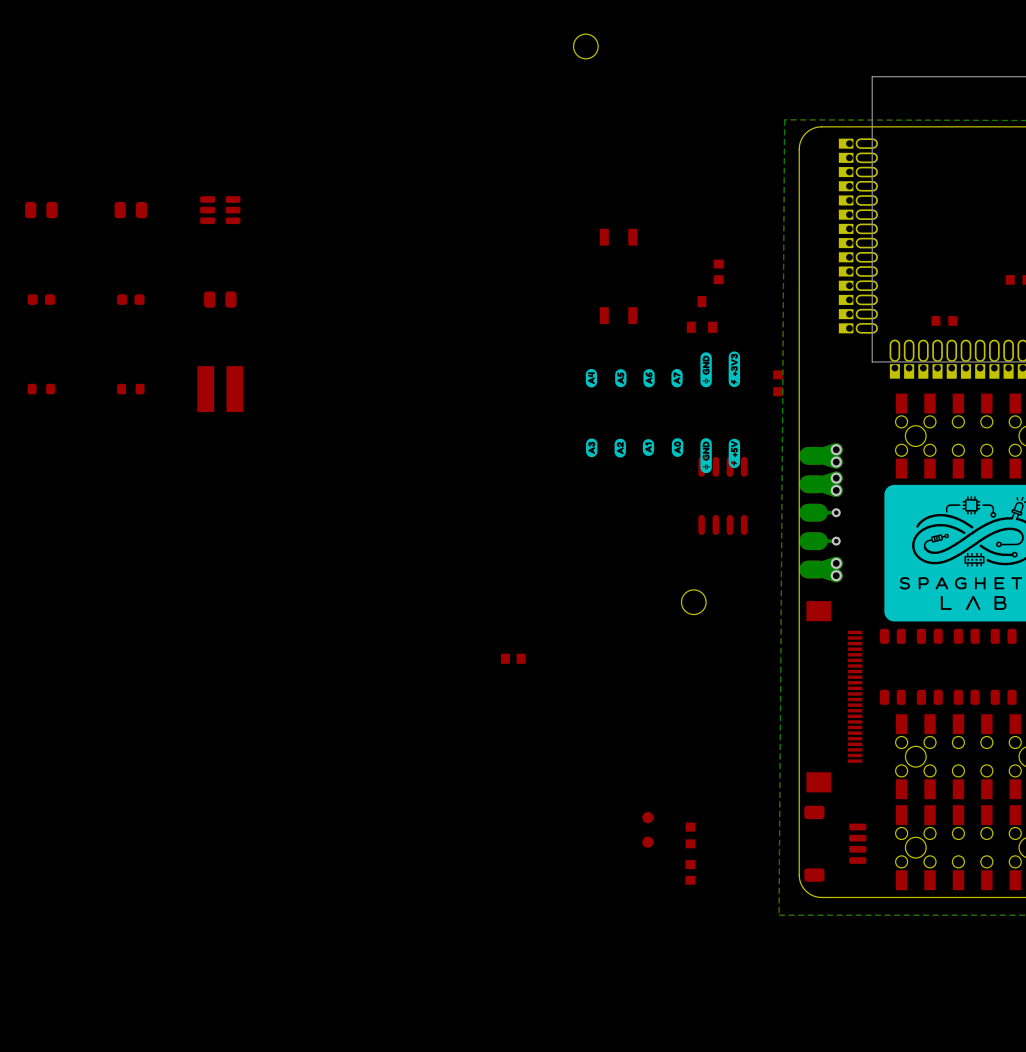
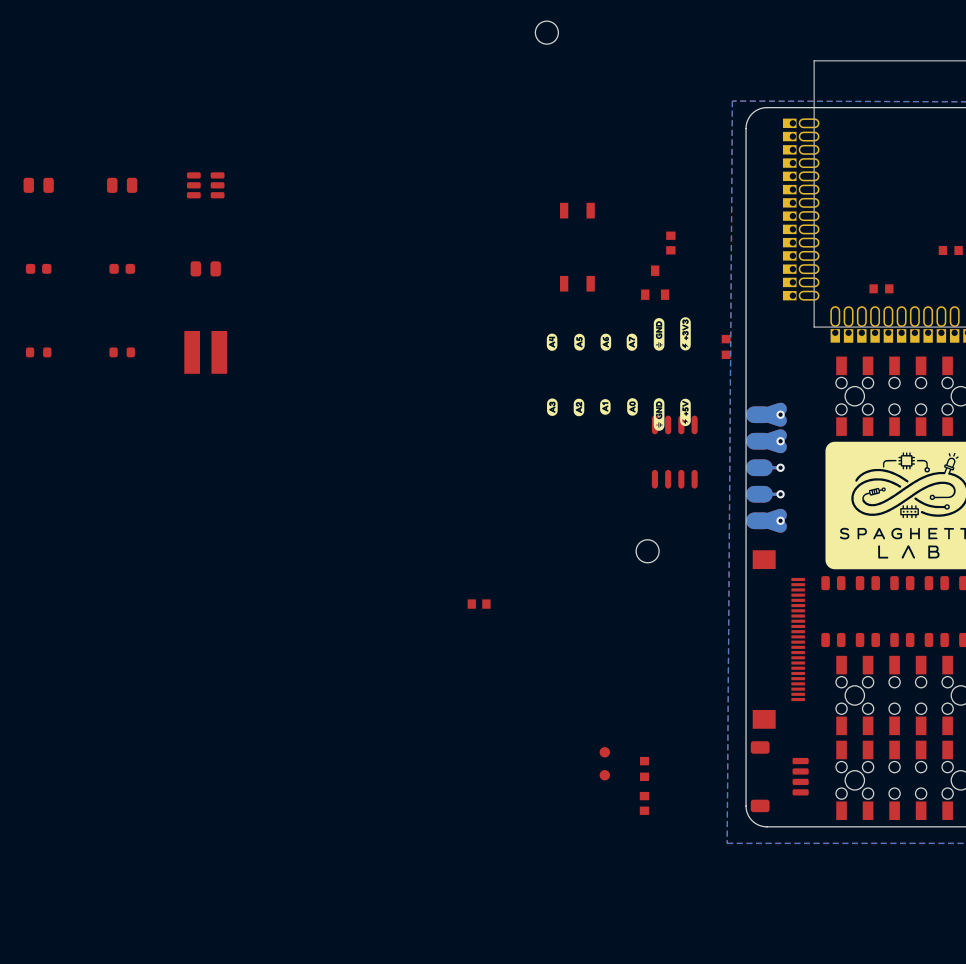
via: (836, 449) -> none
via: none -> (780, 414)
via: (836, 462) -> none
via: (836, 478) -> none
via: none -> (780, 441)
via: (836, 490) -> none
via: (836, 563) -> none
via: none -> (780, 520)
via: (836, 575) -> none

